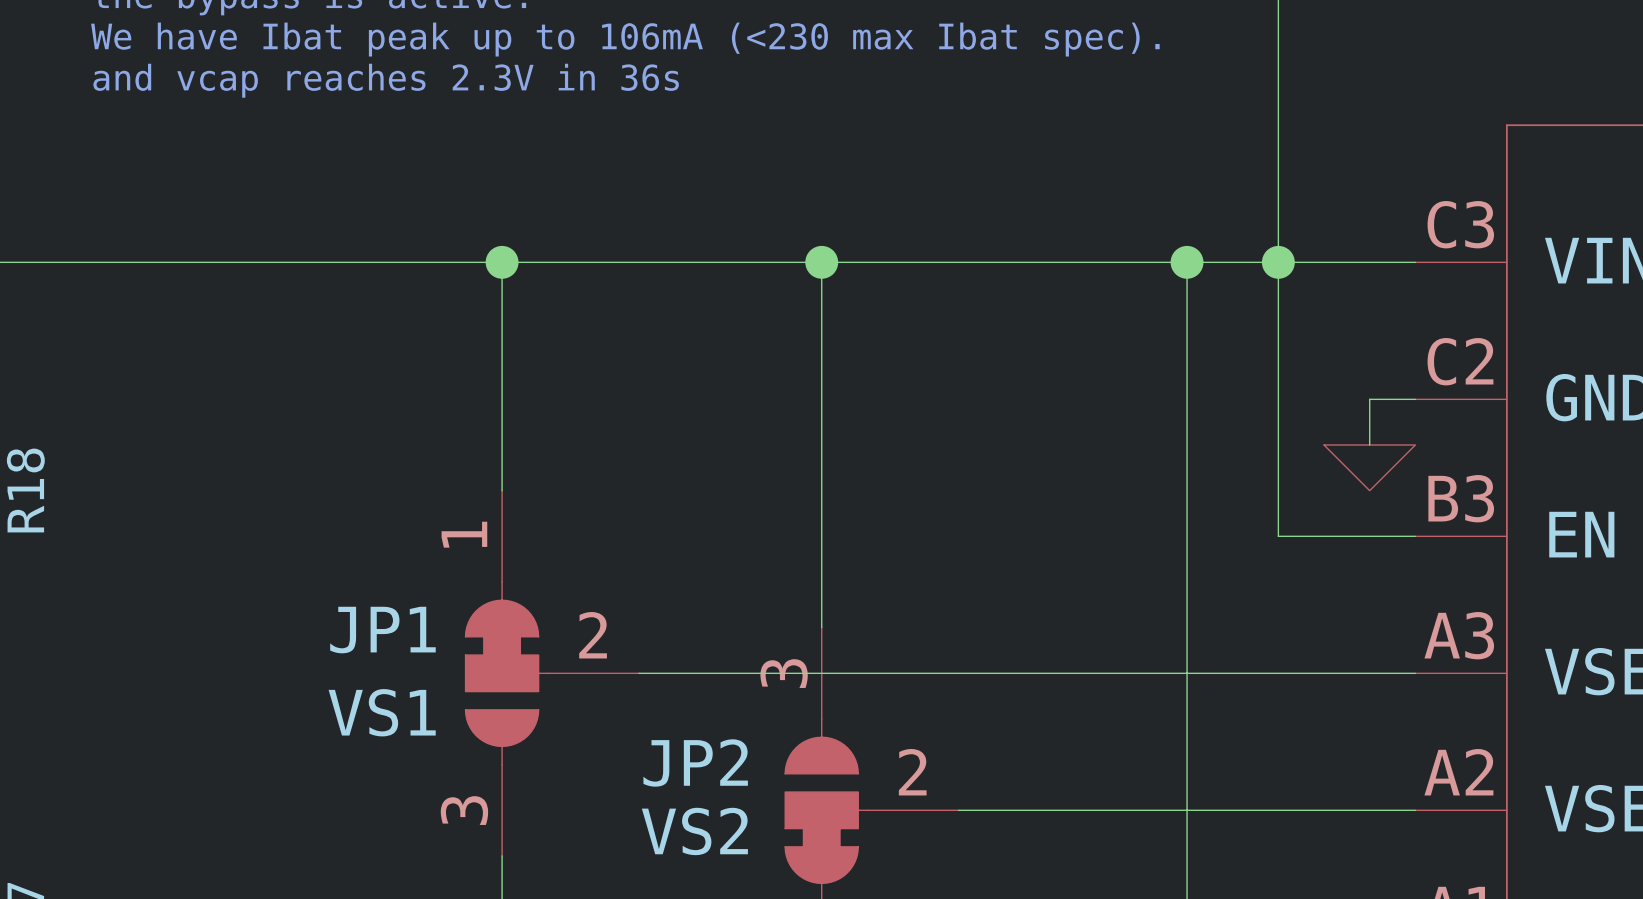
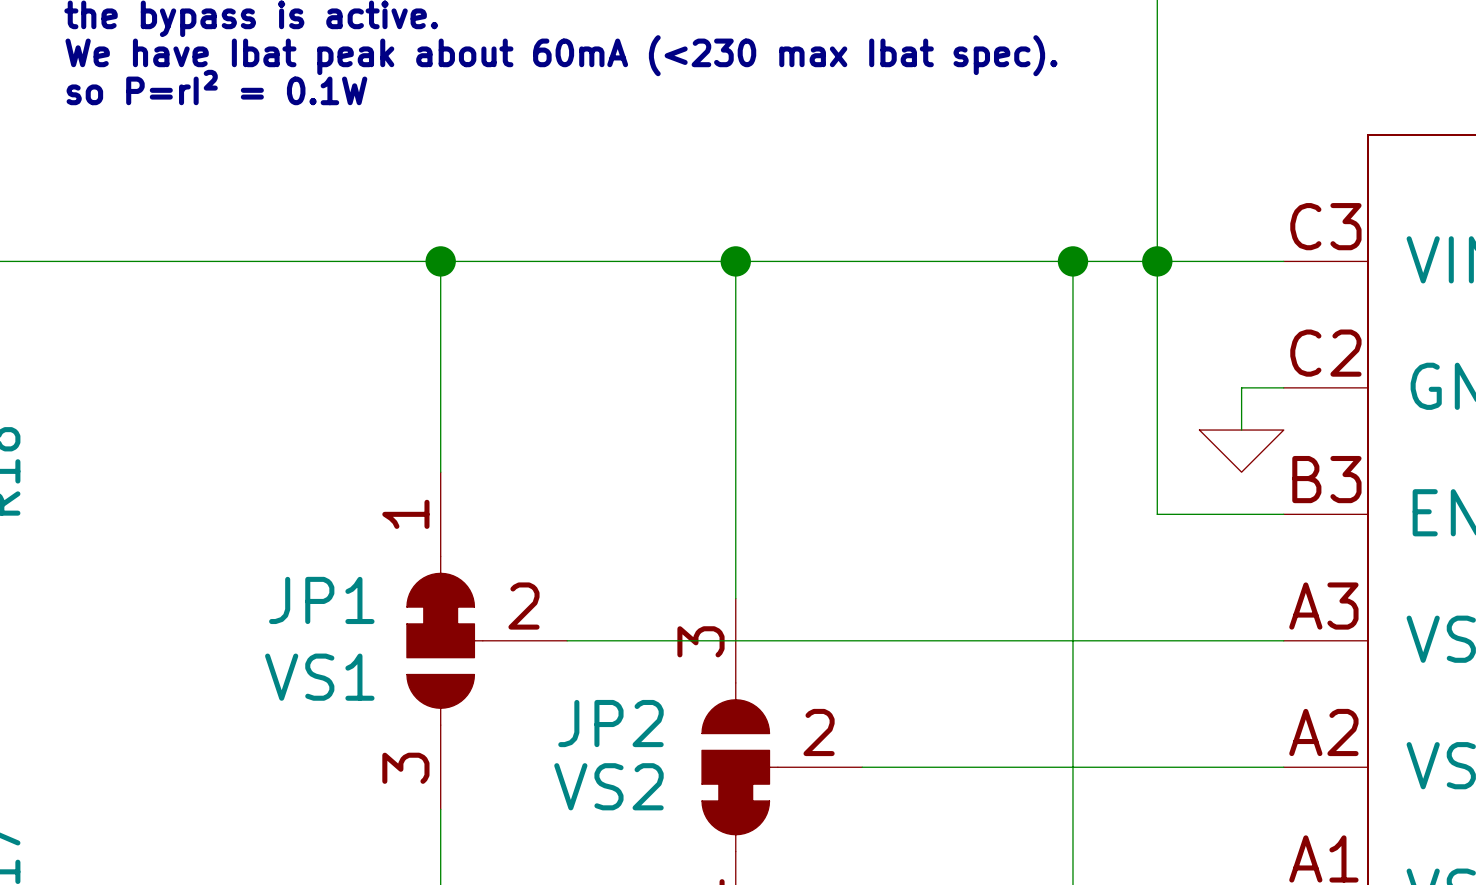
text: We have Ibat peak up to 106mA (<230 max Ibat spec). (625, 39) -> We have Ibat peak about 60mA (<230 max Ibat spec). (561, 55)
text: and vcap reaches 2.3V in 36s (386, 80) -> so P=rI² = 0.1W (216, 87)

